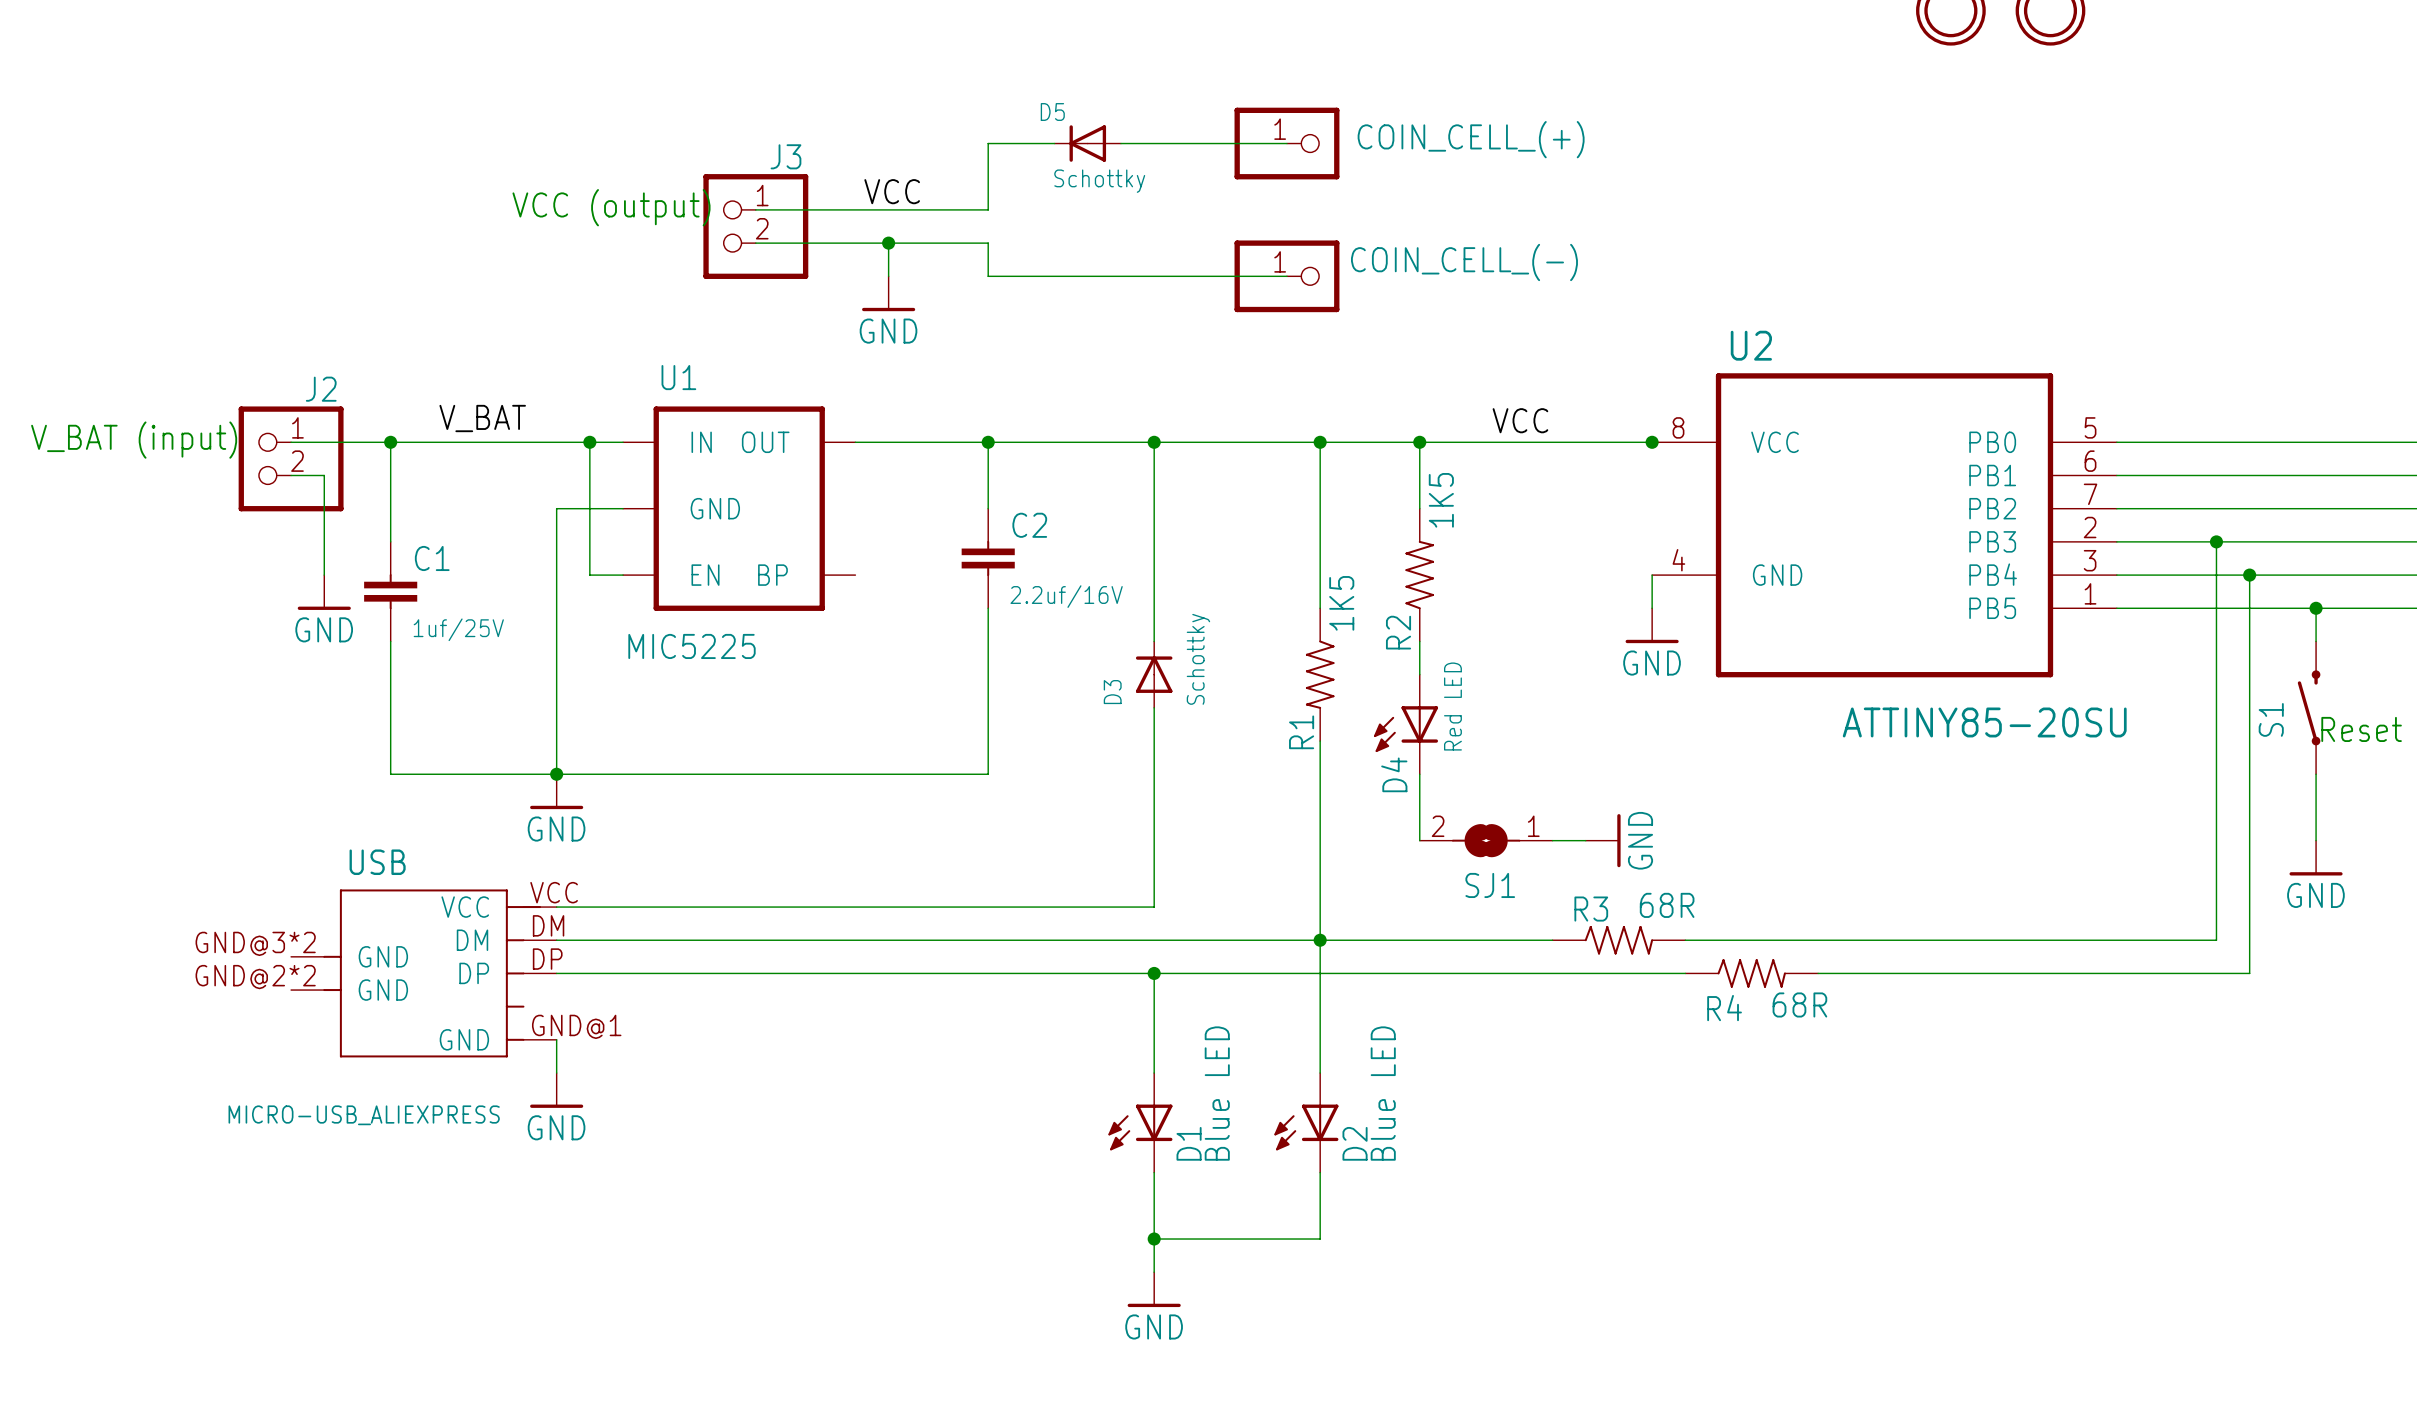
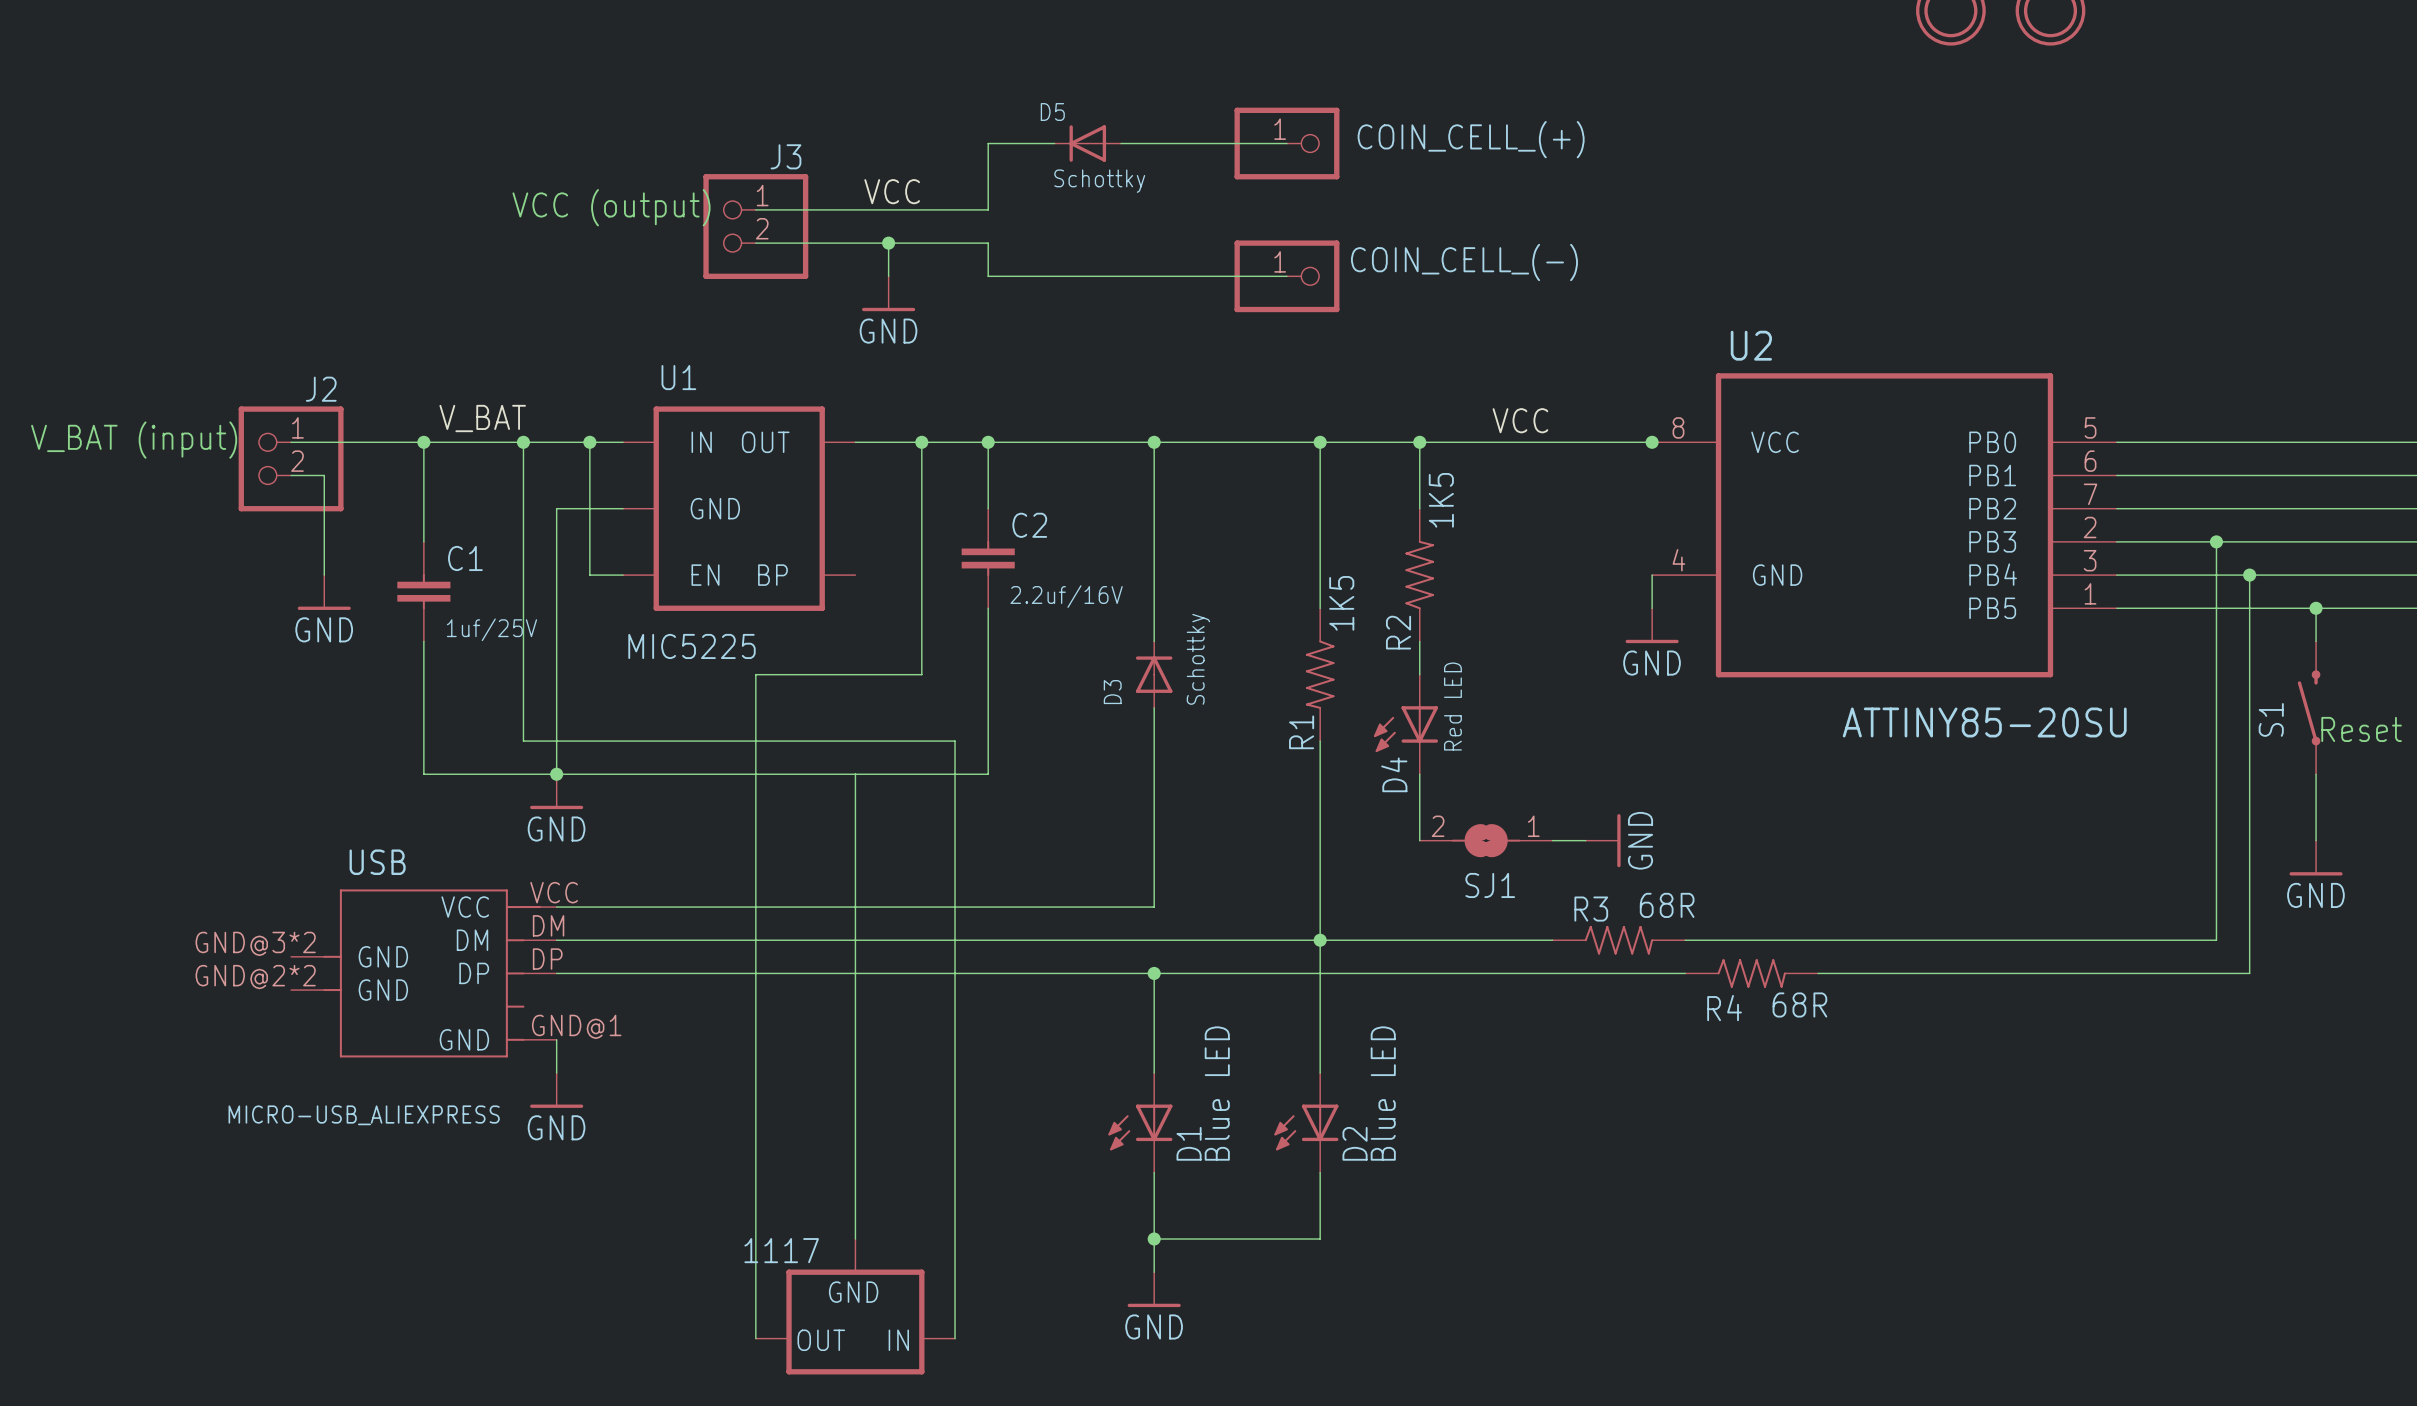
wire: (390, 442) (390, 541) -> (423, 442) (423, 541)
junction position: (390, 442) -> (423, 442)
wire: none -> (523, 442) (523, 741) (955, 741) (955, 1338)
junction: none -> (523, 442)
wire: none -> (921, 442) (921, 674) (755, 674) (755, 1338)
junction: none -> (921, 442)
C1 position: (390, 591) -> (423, 591)
wire: (390, 641) (390, 774) (423, 774) -> (423, 641) (423, 774)
wire: none -> (855, 774) (855, 1239)
1117: none -> (855, 1306)

